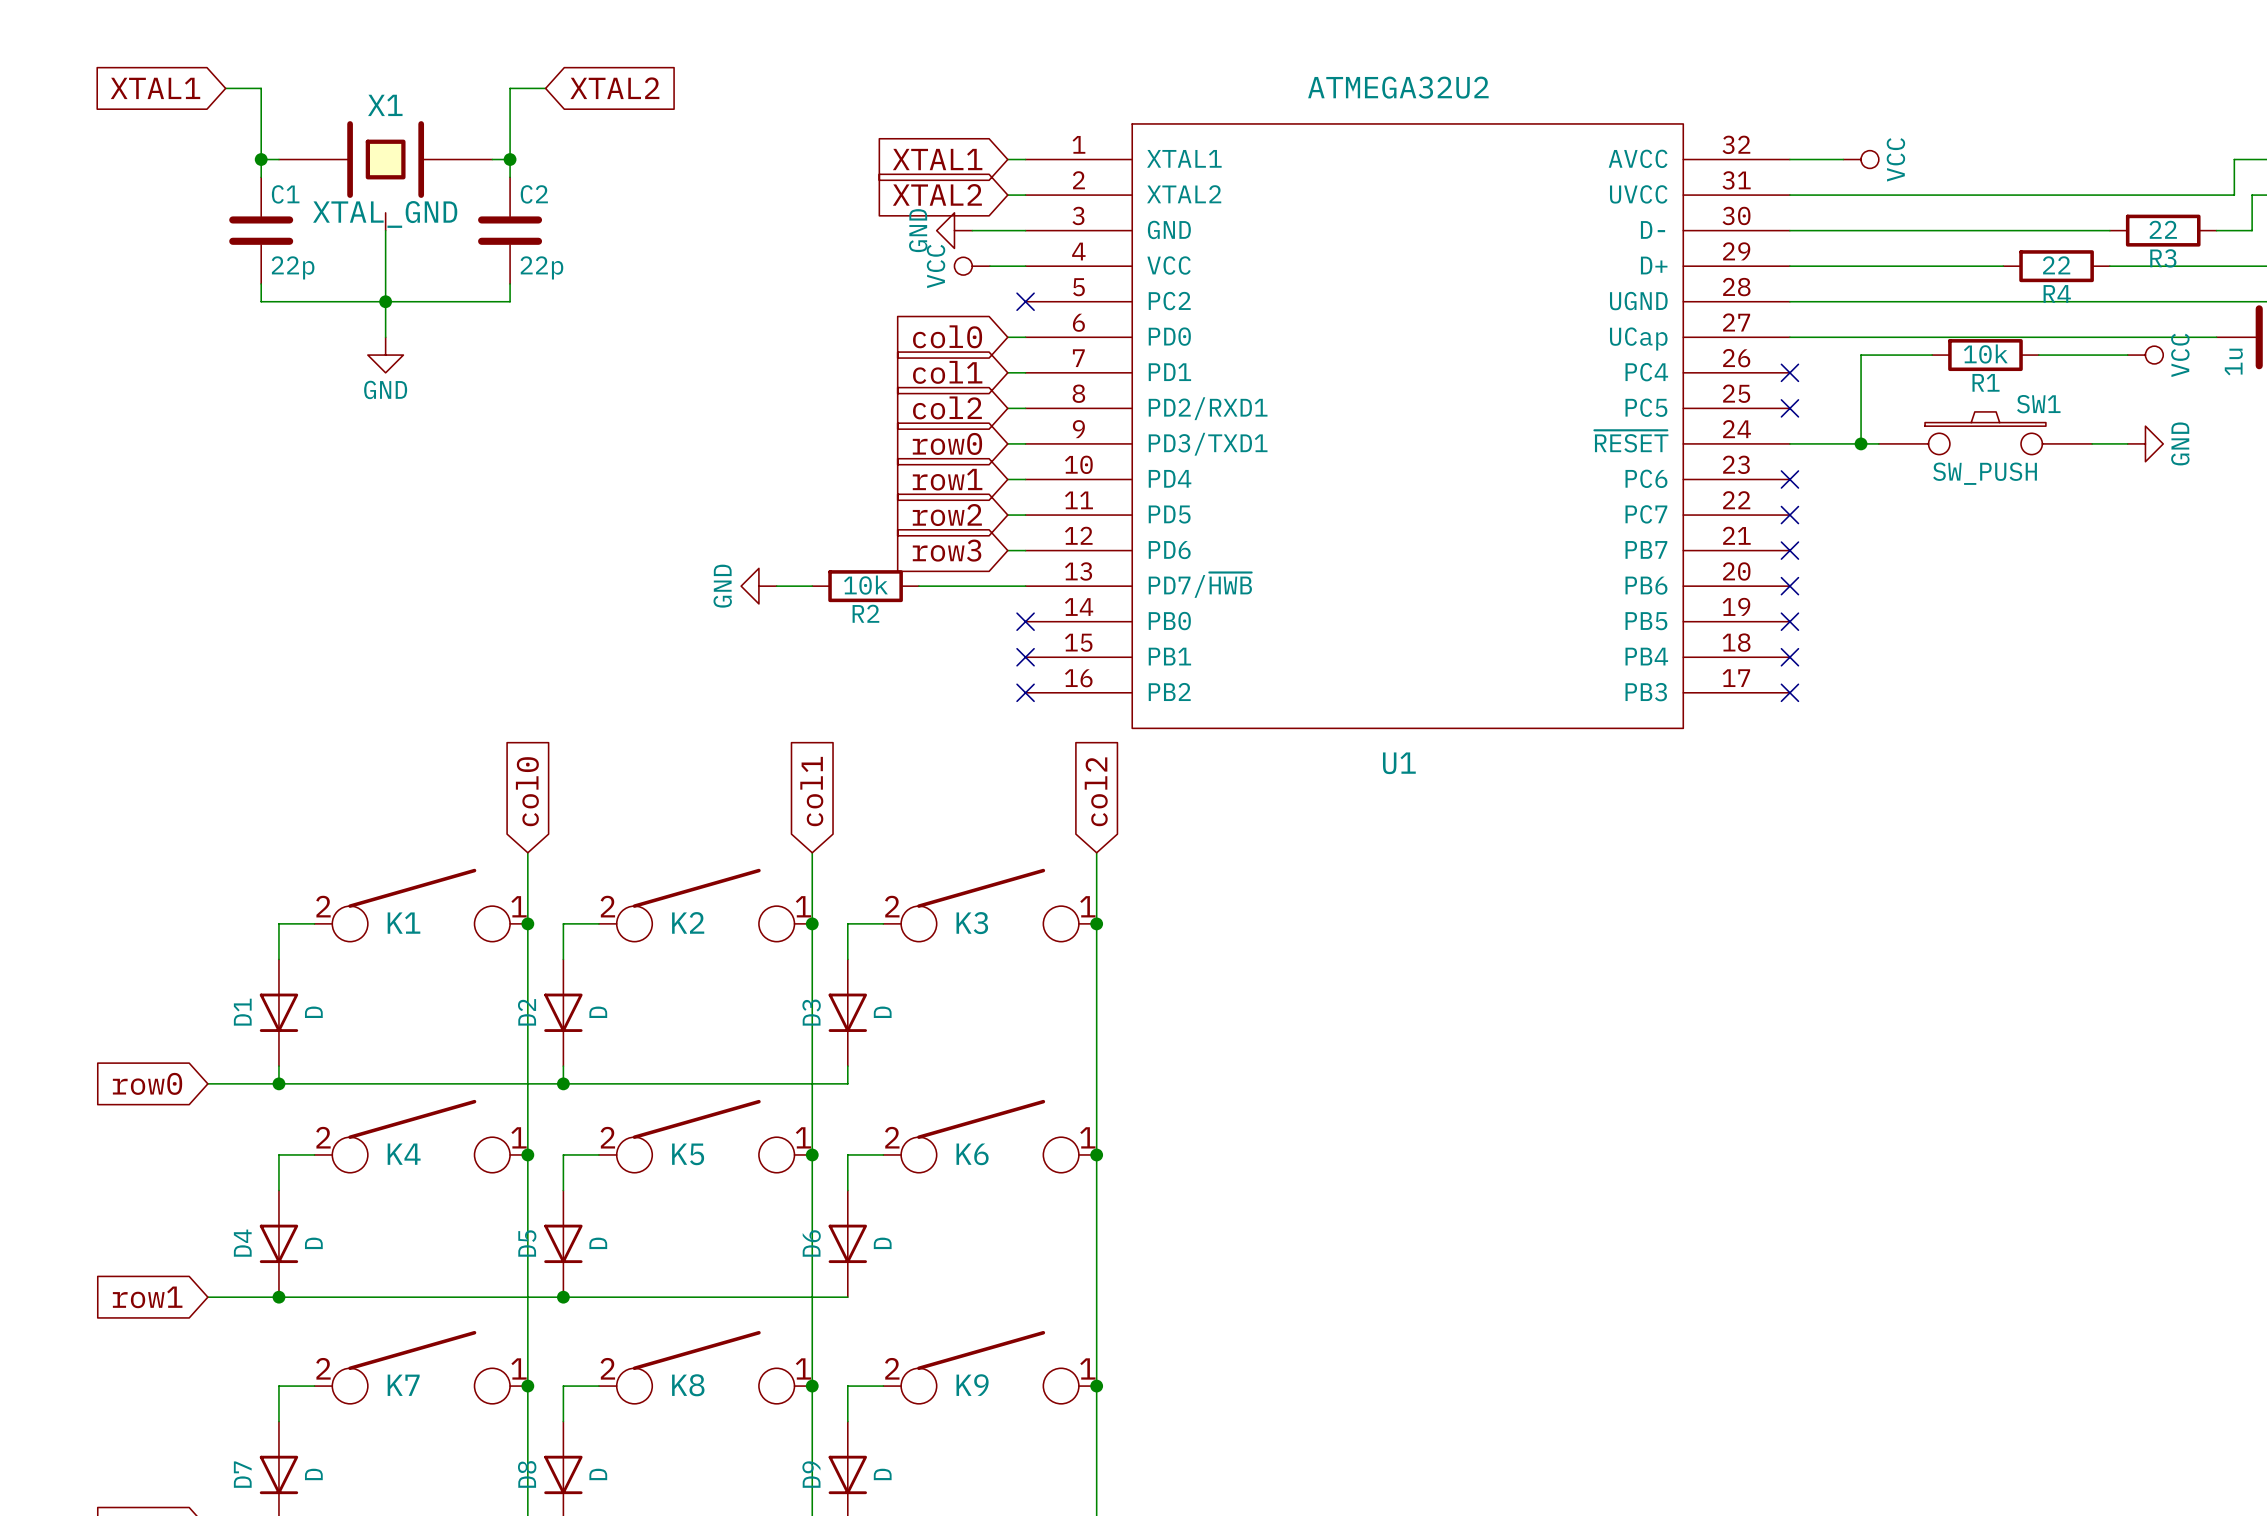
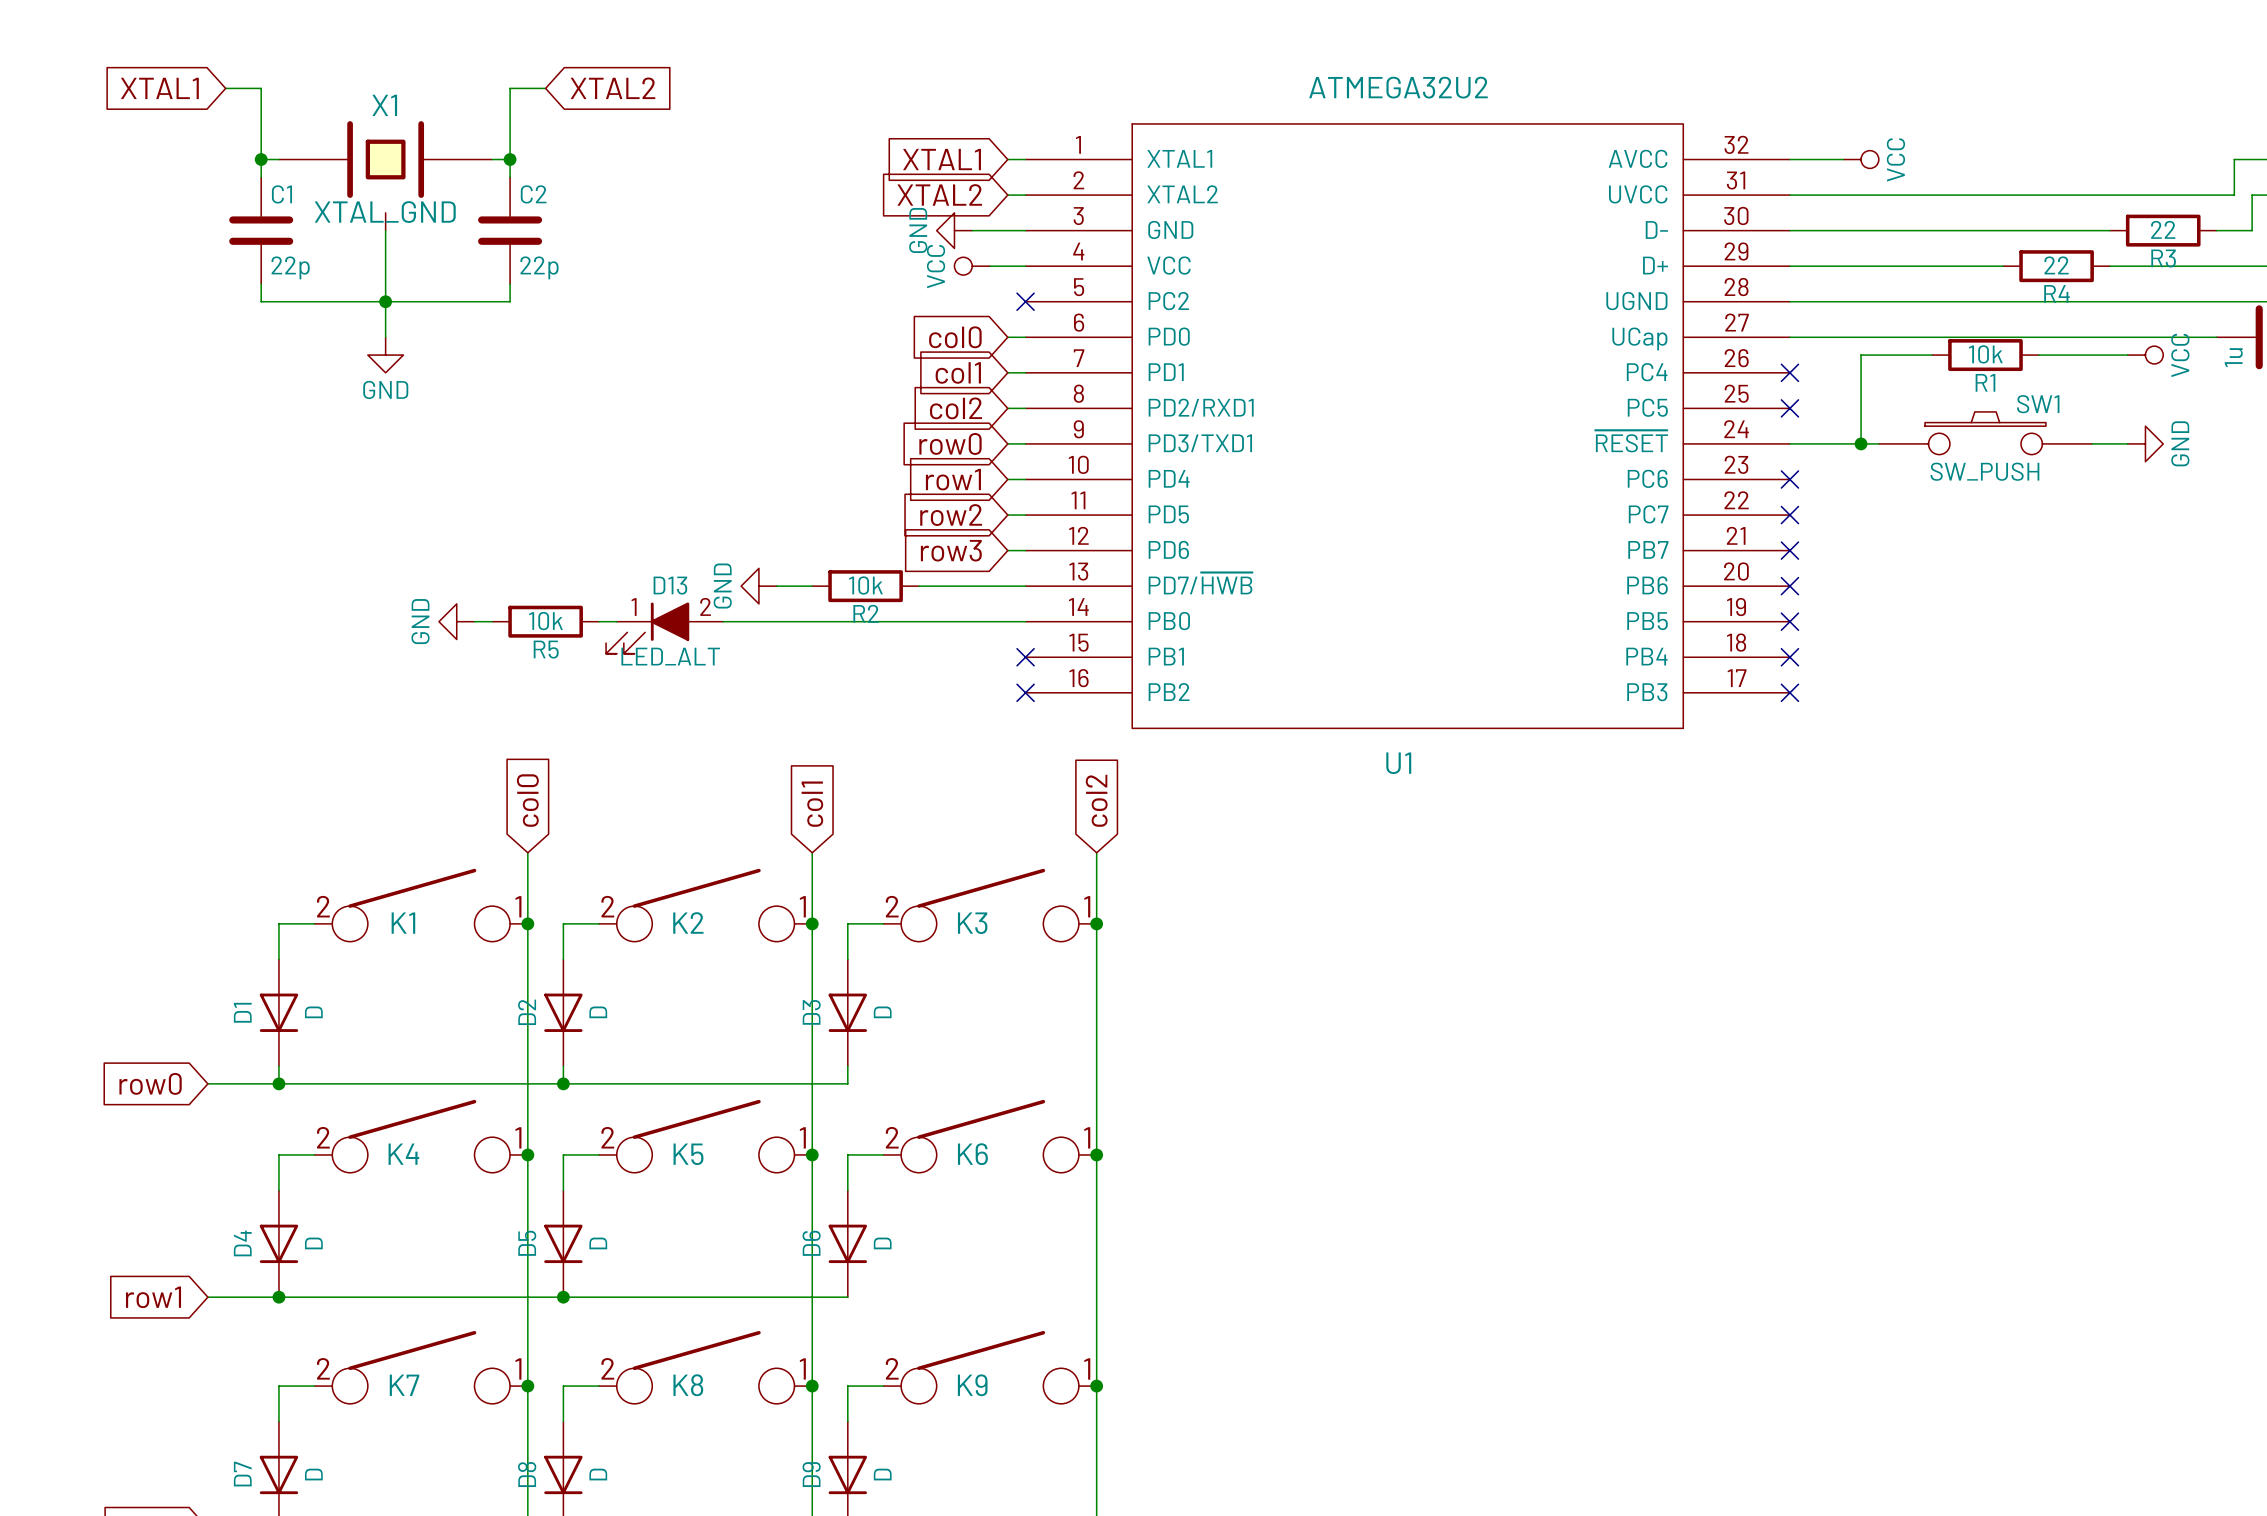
power symbol: none -> GND (456, 621)
wire: none -> (474, 621) (492, 621)
R5: none -> 10k (545, 621)
wire: none -> (598, 621) (616, 621)
wire: none -> (723, 621) (1025, 621)
no-connect mark: (1025, 621) -> none
D13: none -> LED_ALT (664, 628)

